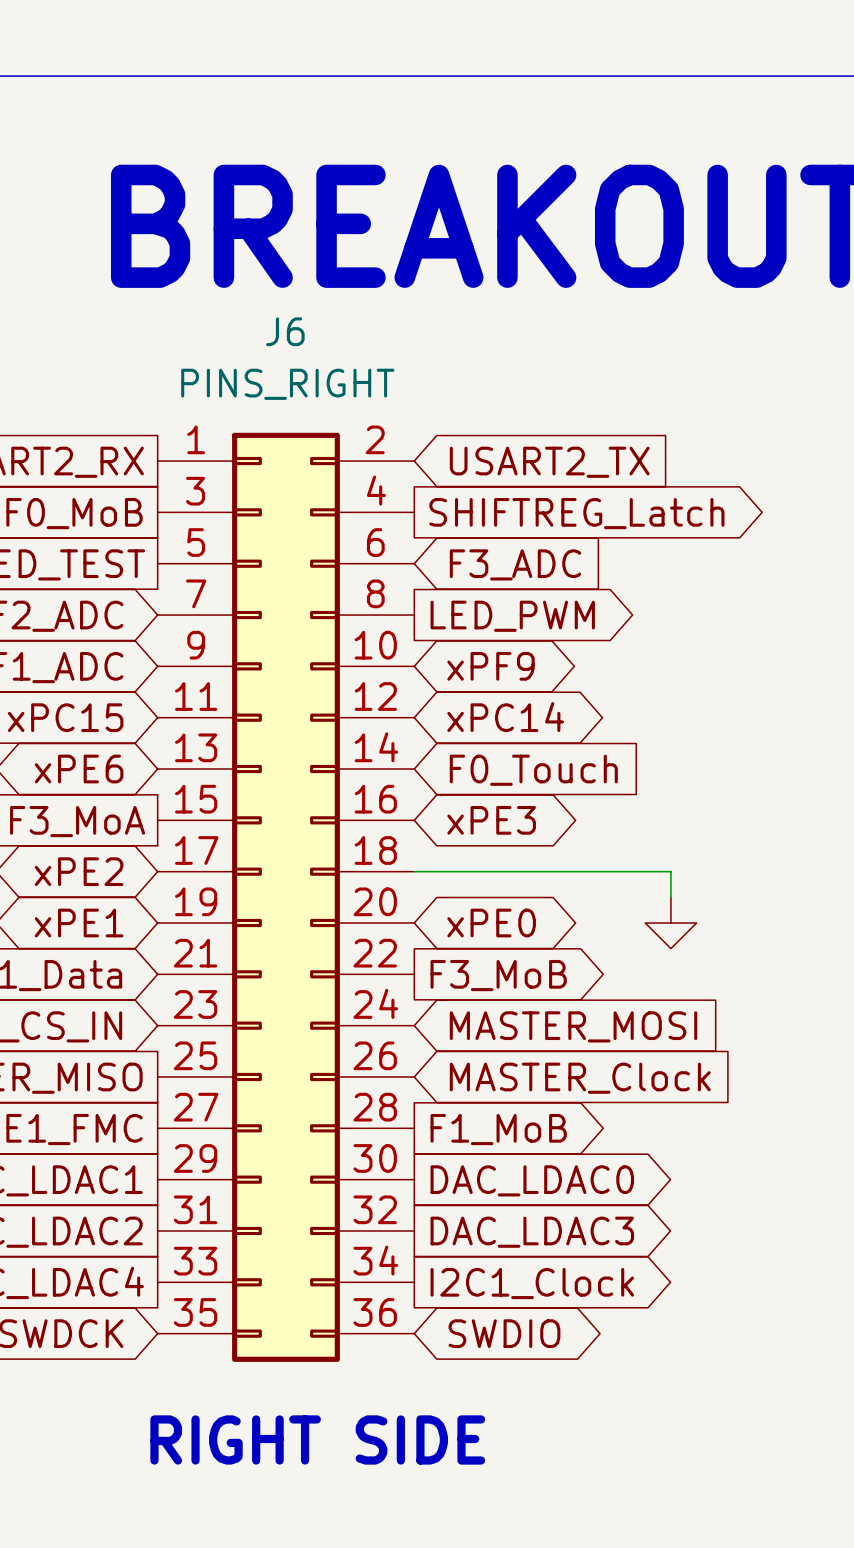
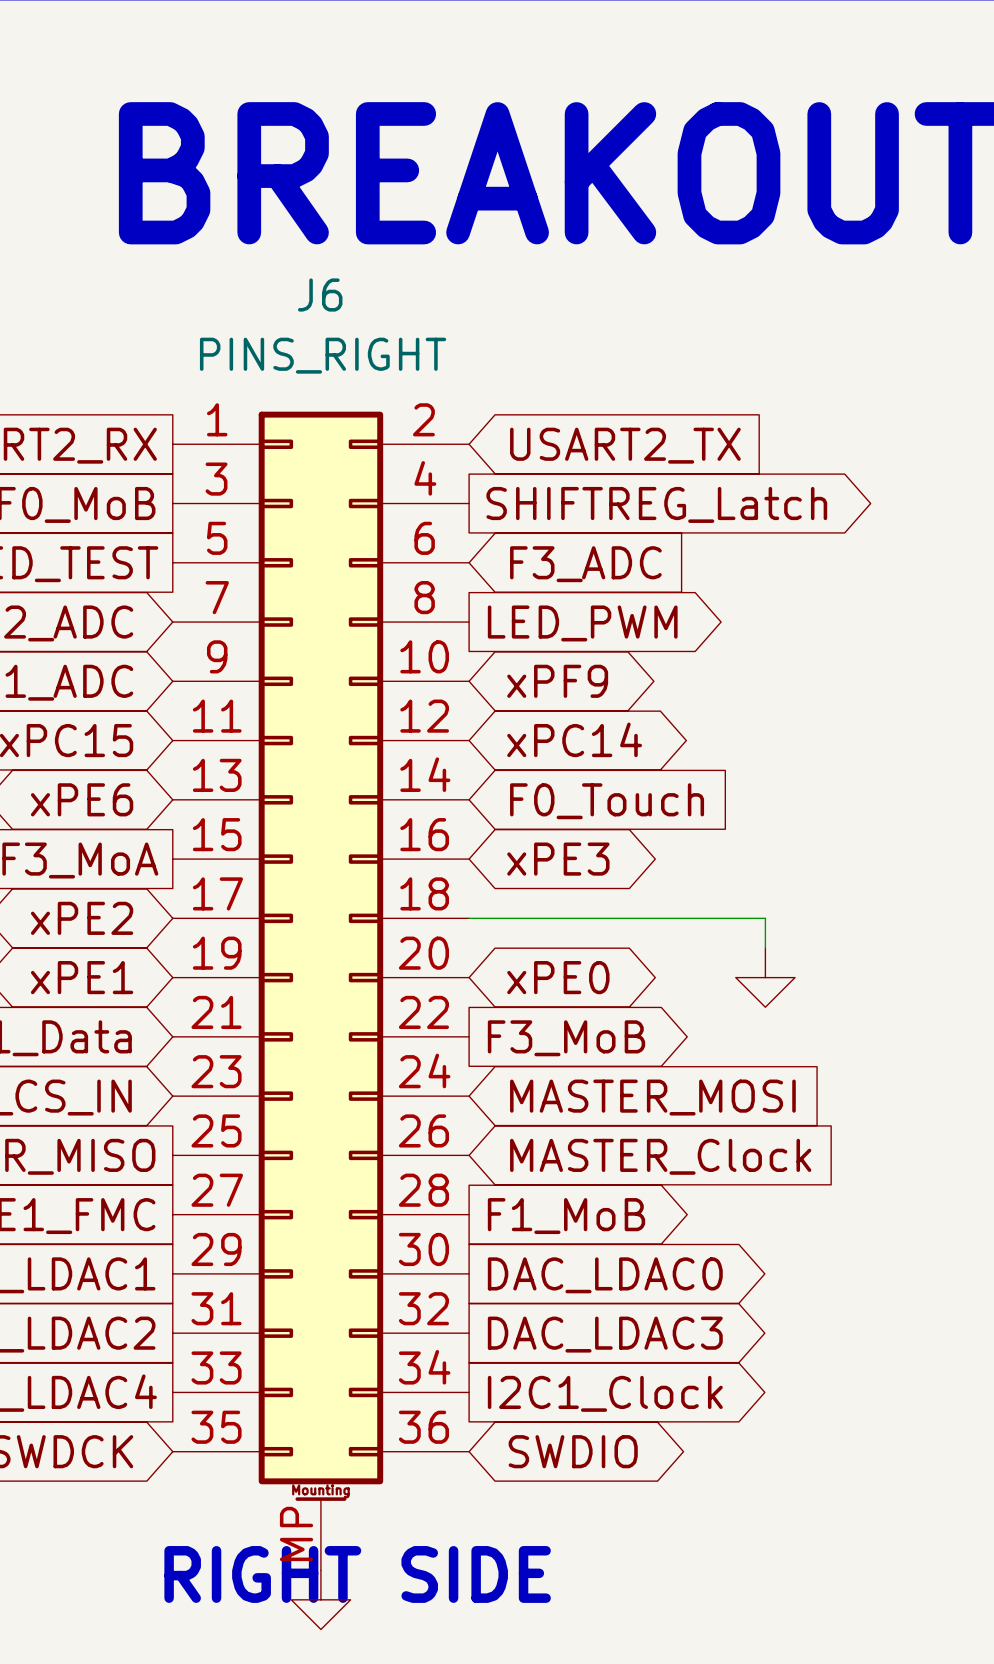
J6 symbol: [157, 432, 415, 1362] -> [172, 411, 470, 1571]
power symbol: none -> (320, 1599)

